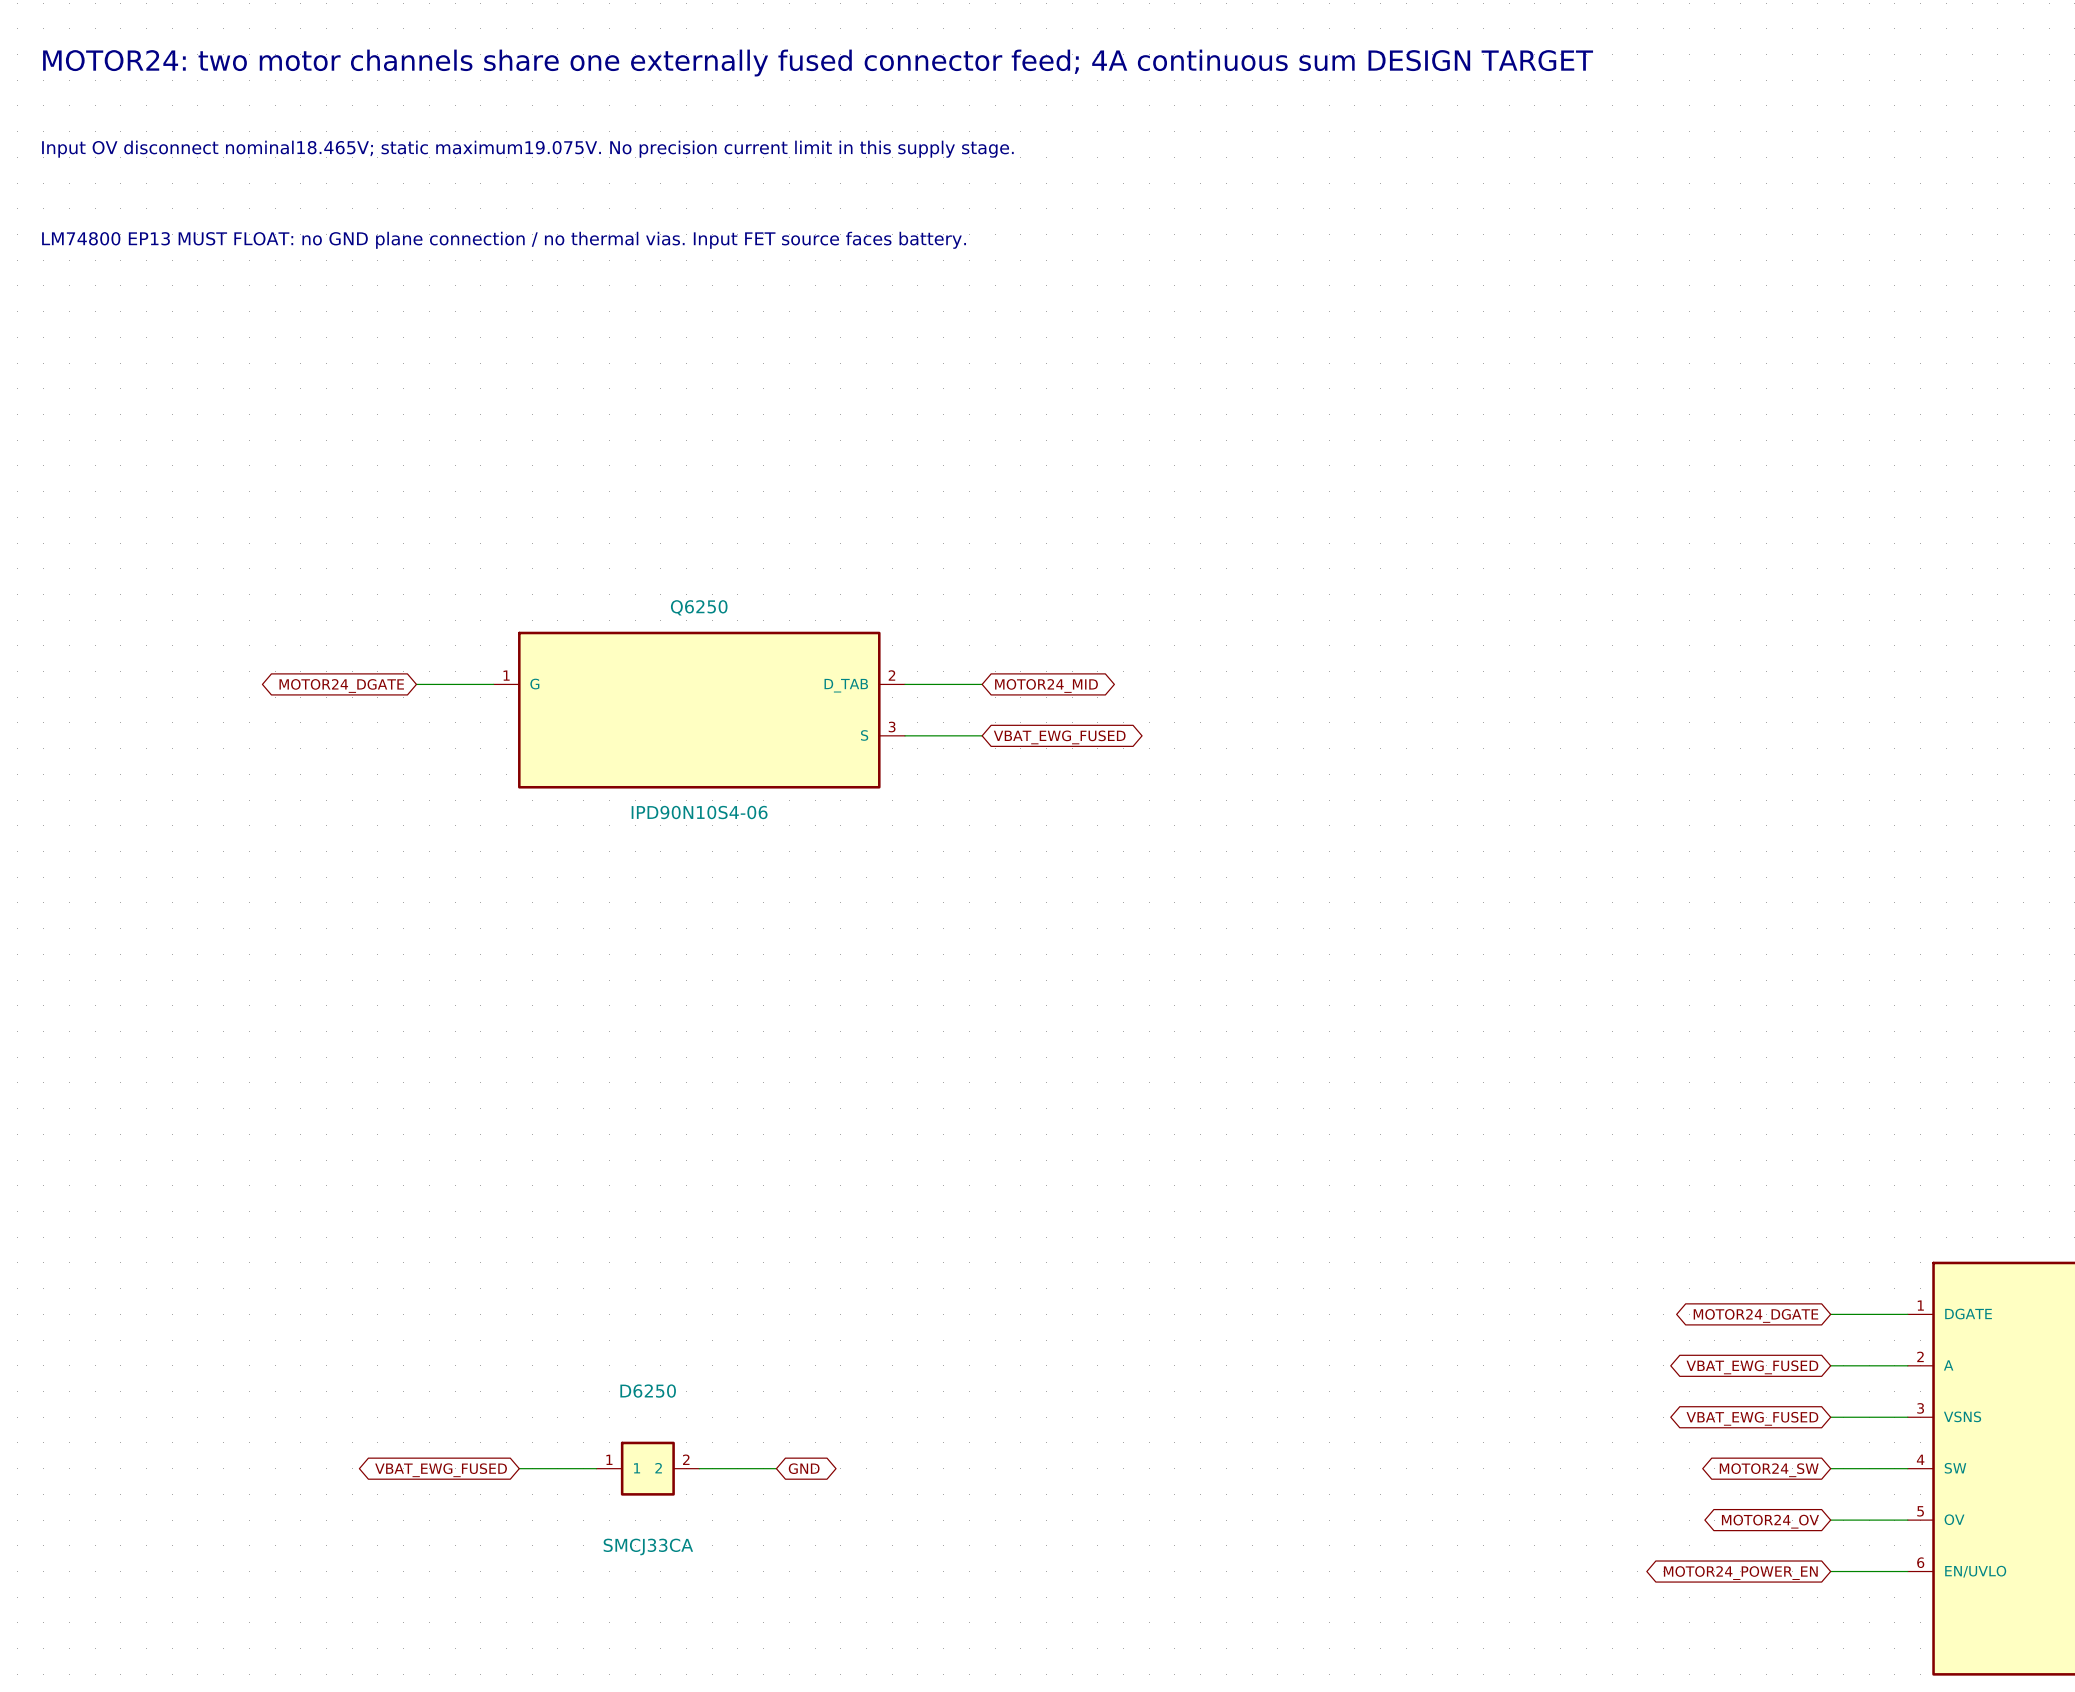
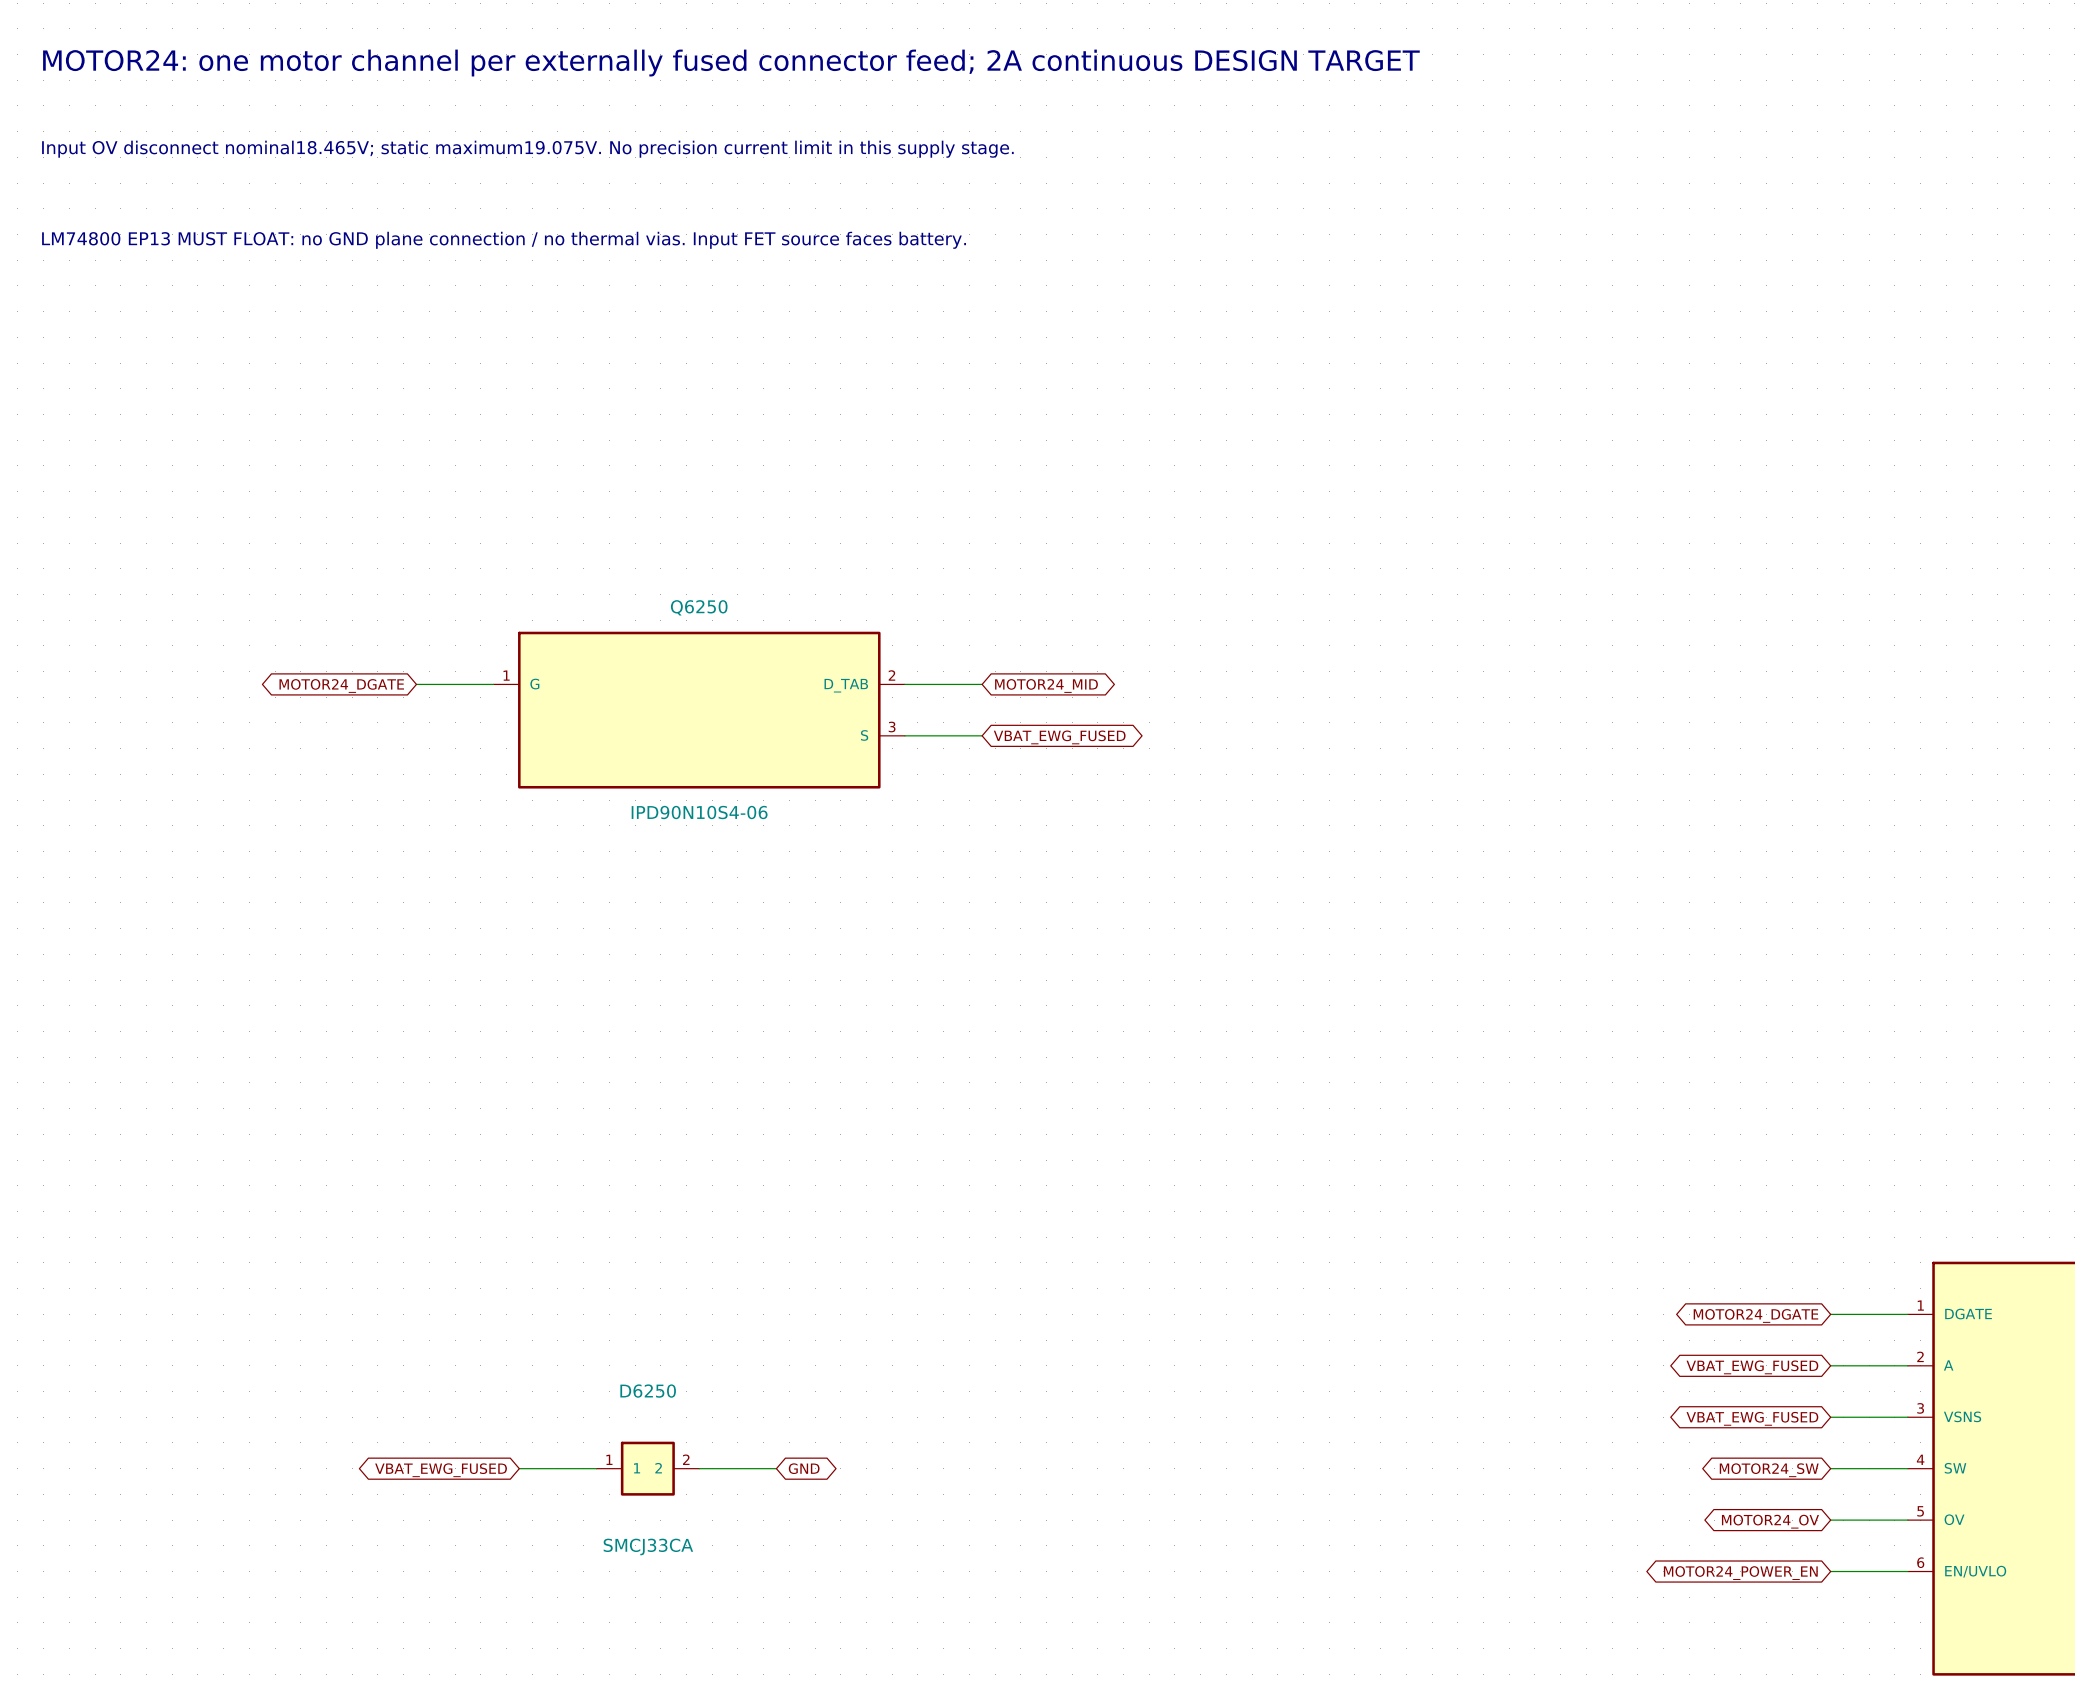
text: MOTOR24: two motor channels share one externally fused connector feed; 4A continuous sum DESIGN TARGET (818, 63) -> MOTOR24: one motor channel per externally fused connector feed; 2A continuous DESIGN TARGET (731, 63)

